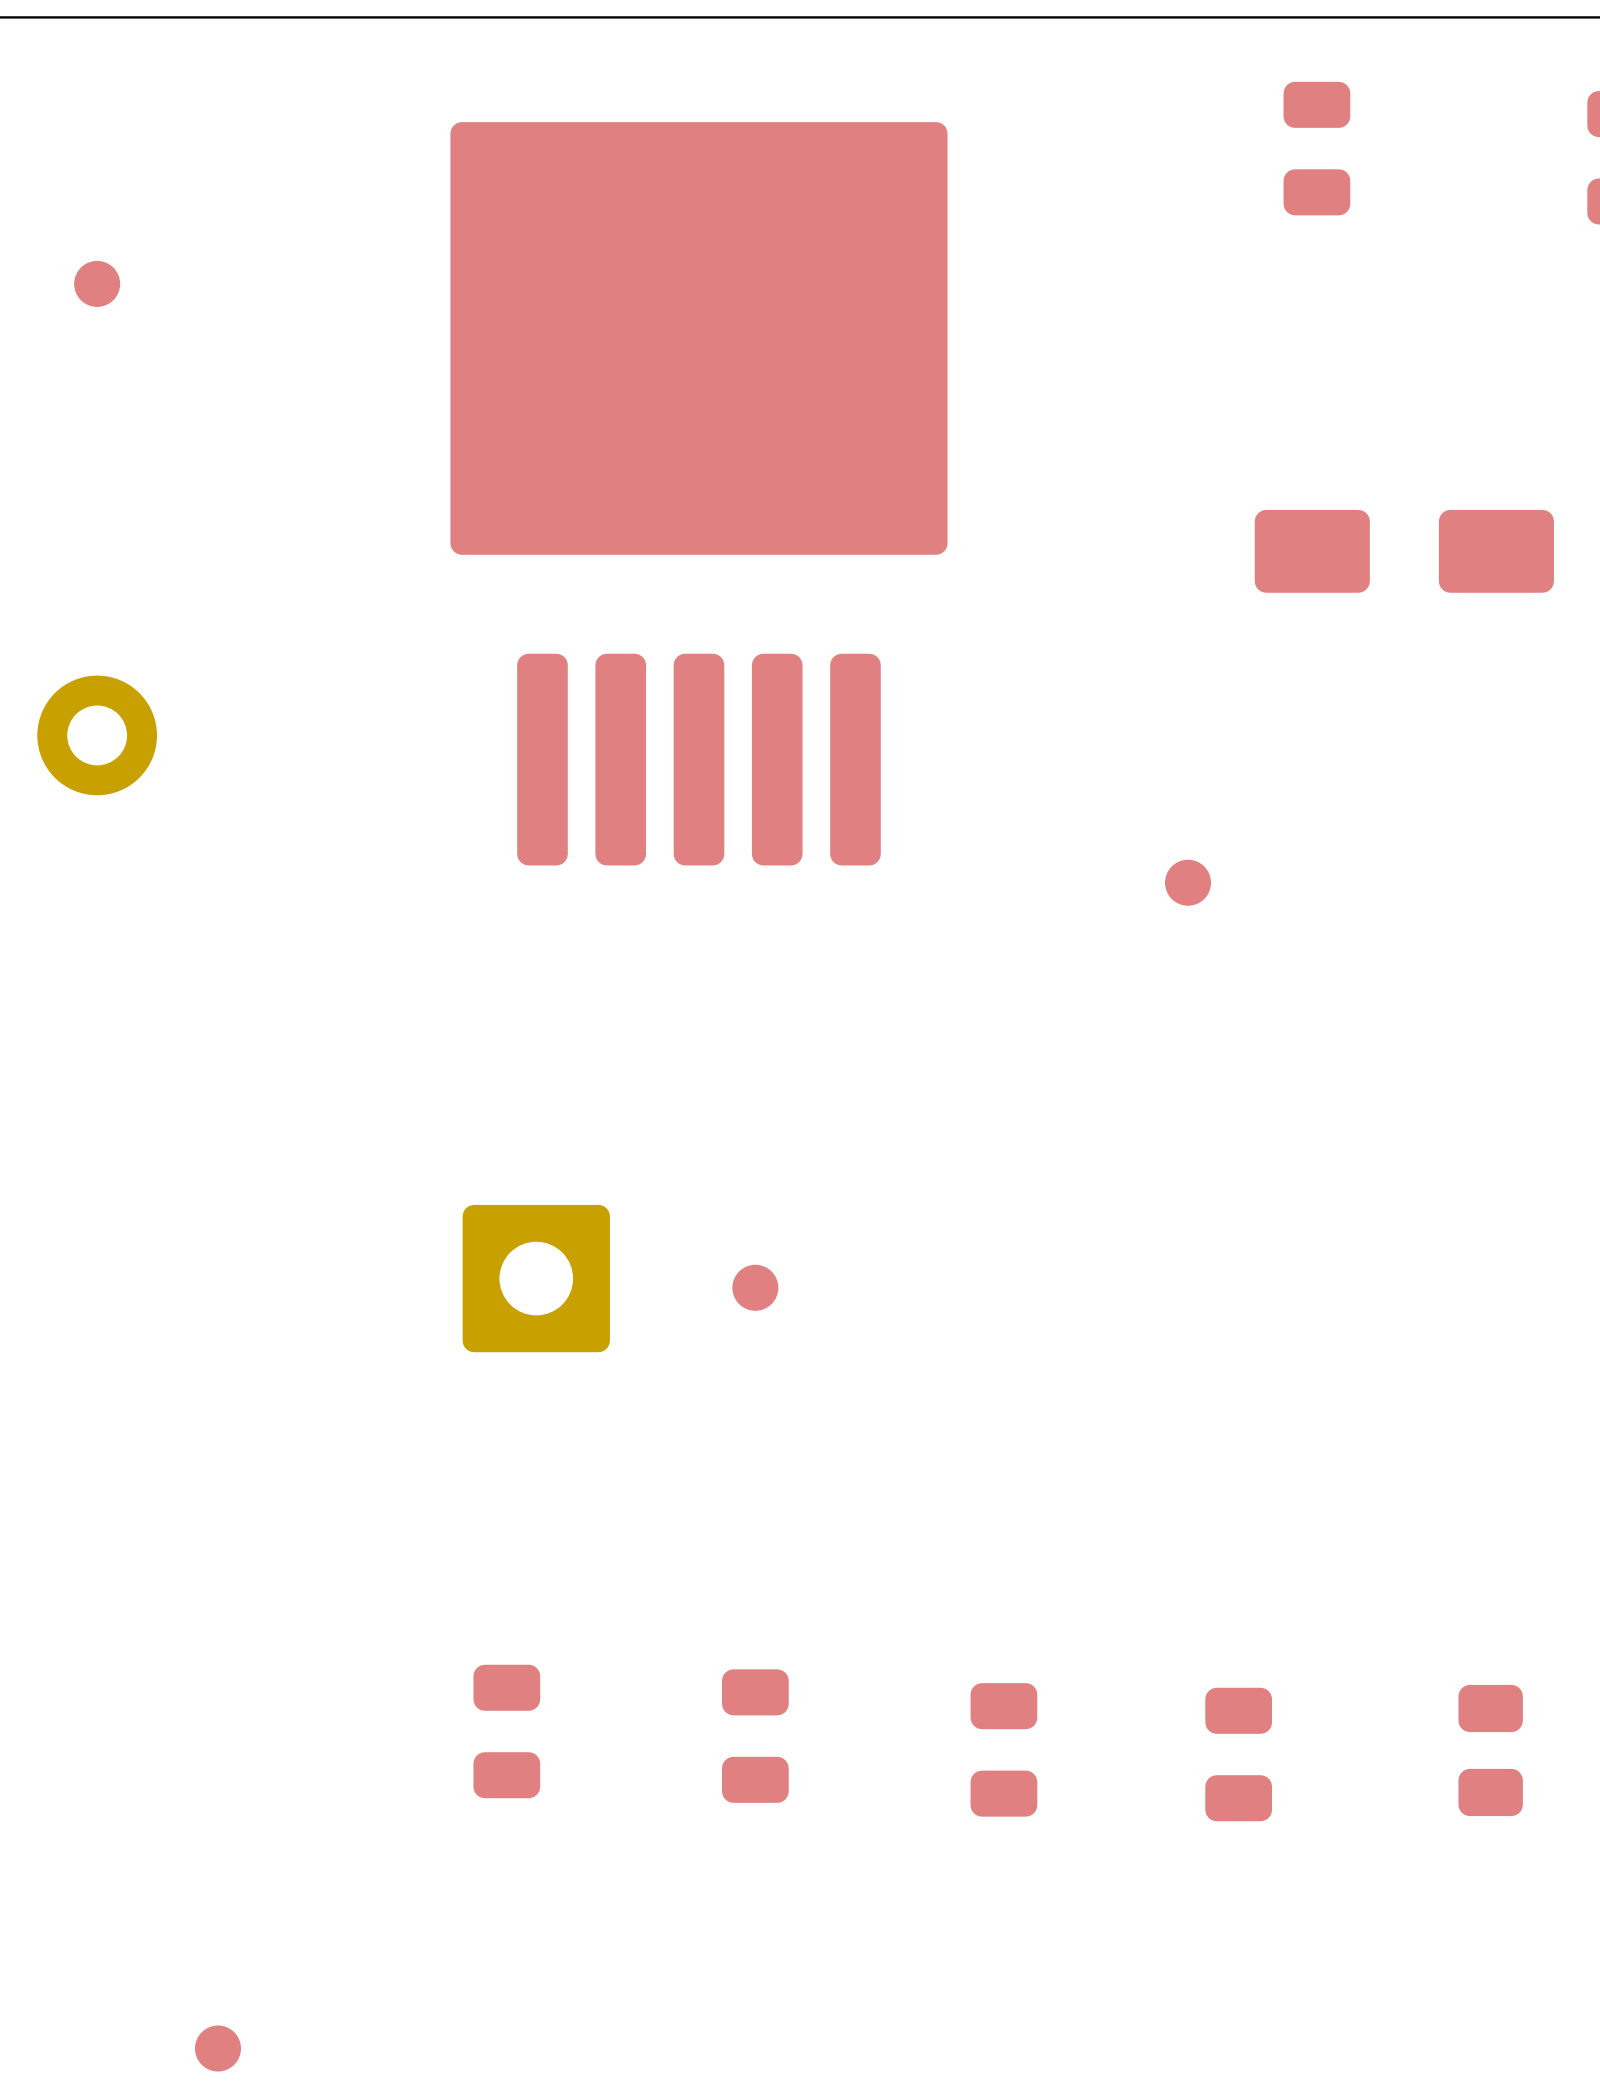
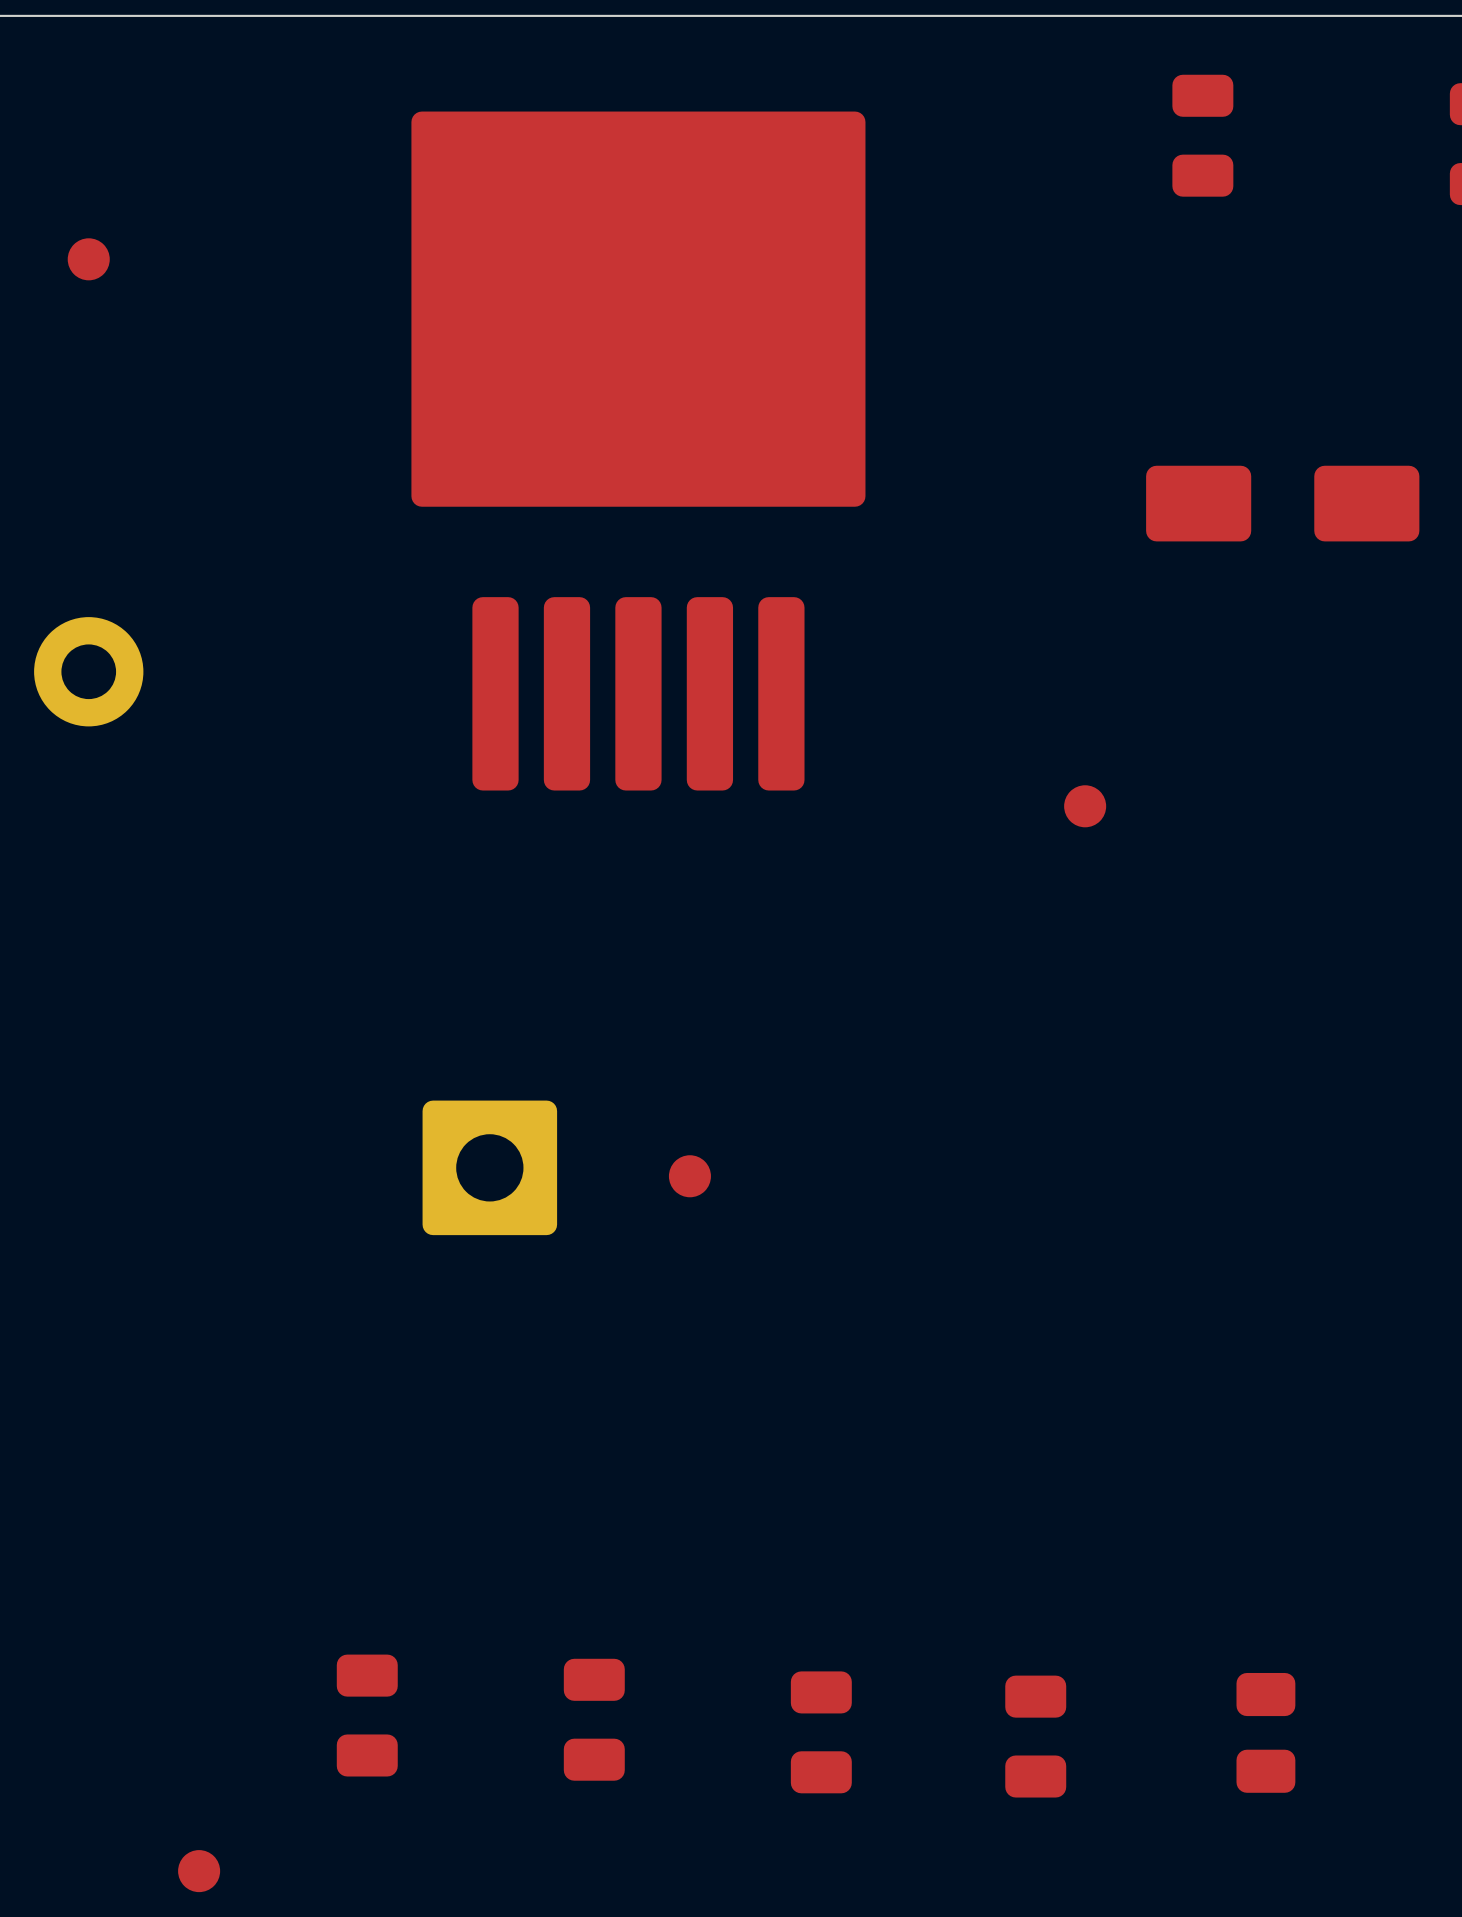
part: (506, 1731) -> none
part: (755, 1736) -> none
part: (1003, 1749) -> none
part position: (1490, 1750) -> (1265, 1732)
part: (1238, 1754) -> none
part: none -> (367, 1715)
part: none -> (594, 1719)
part: none -> (821, 1732)
part: none -> (1035, 1736)

